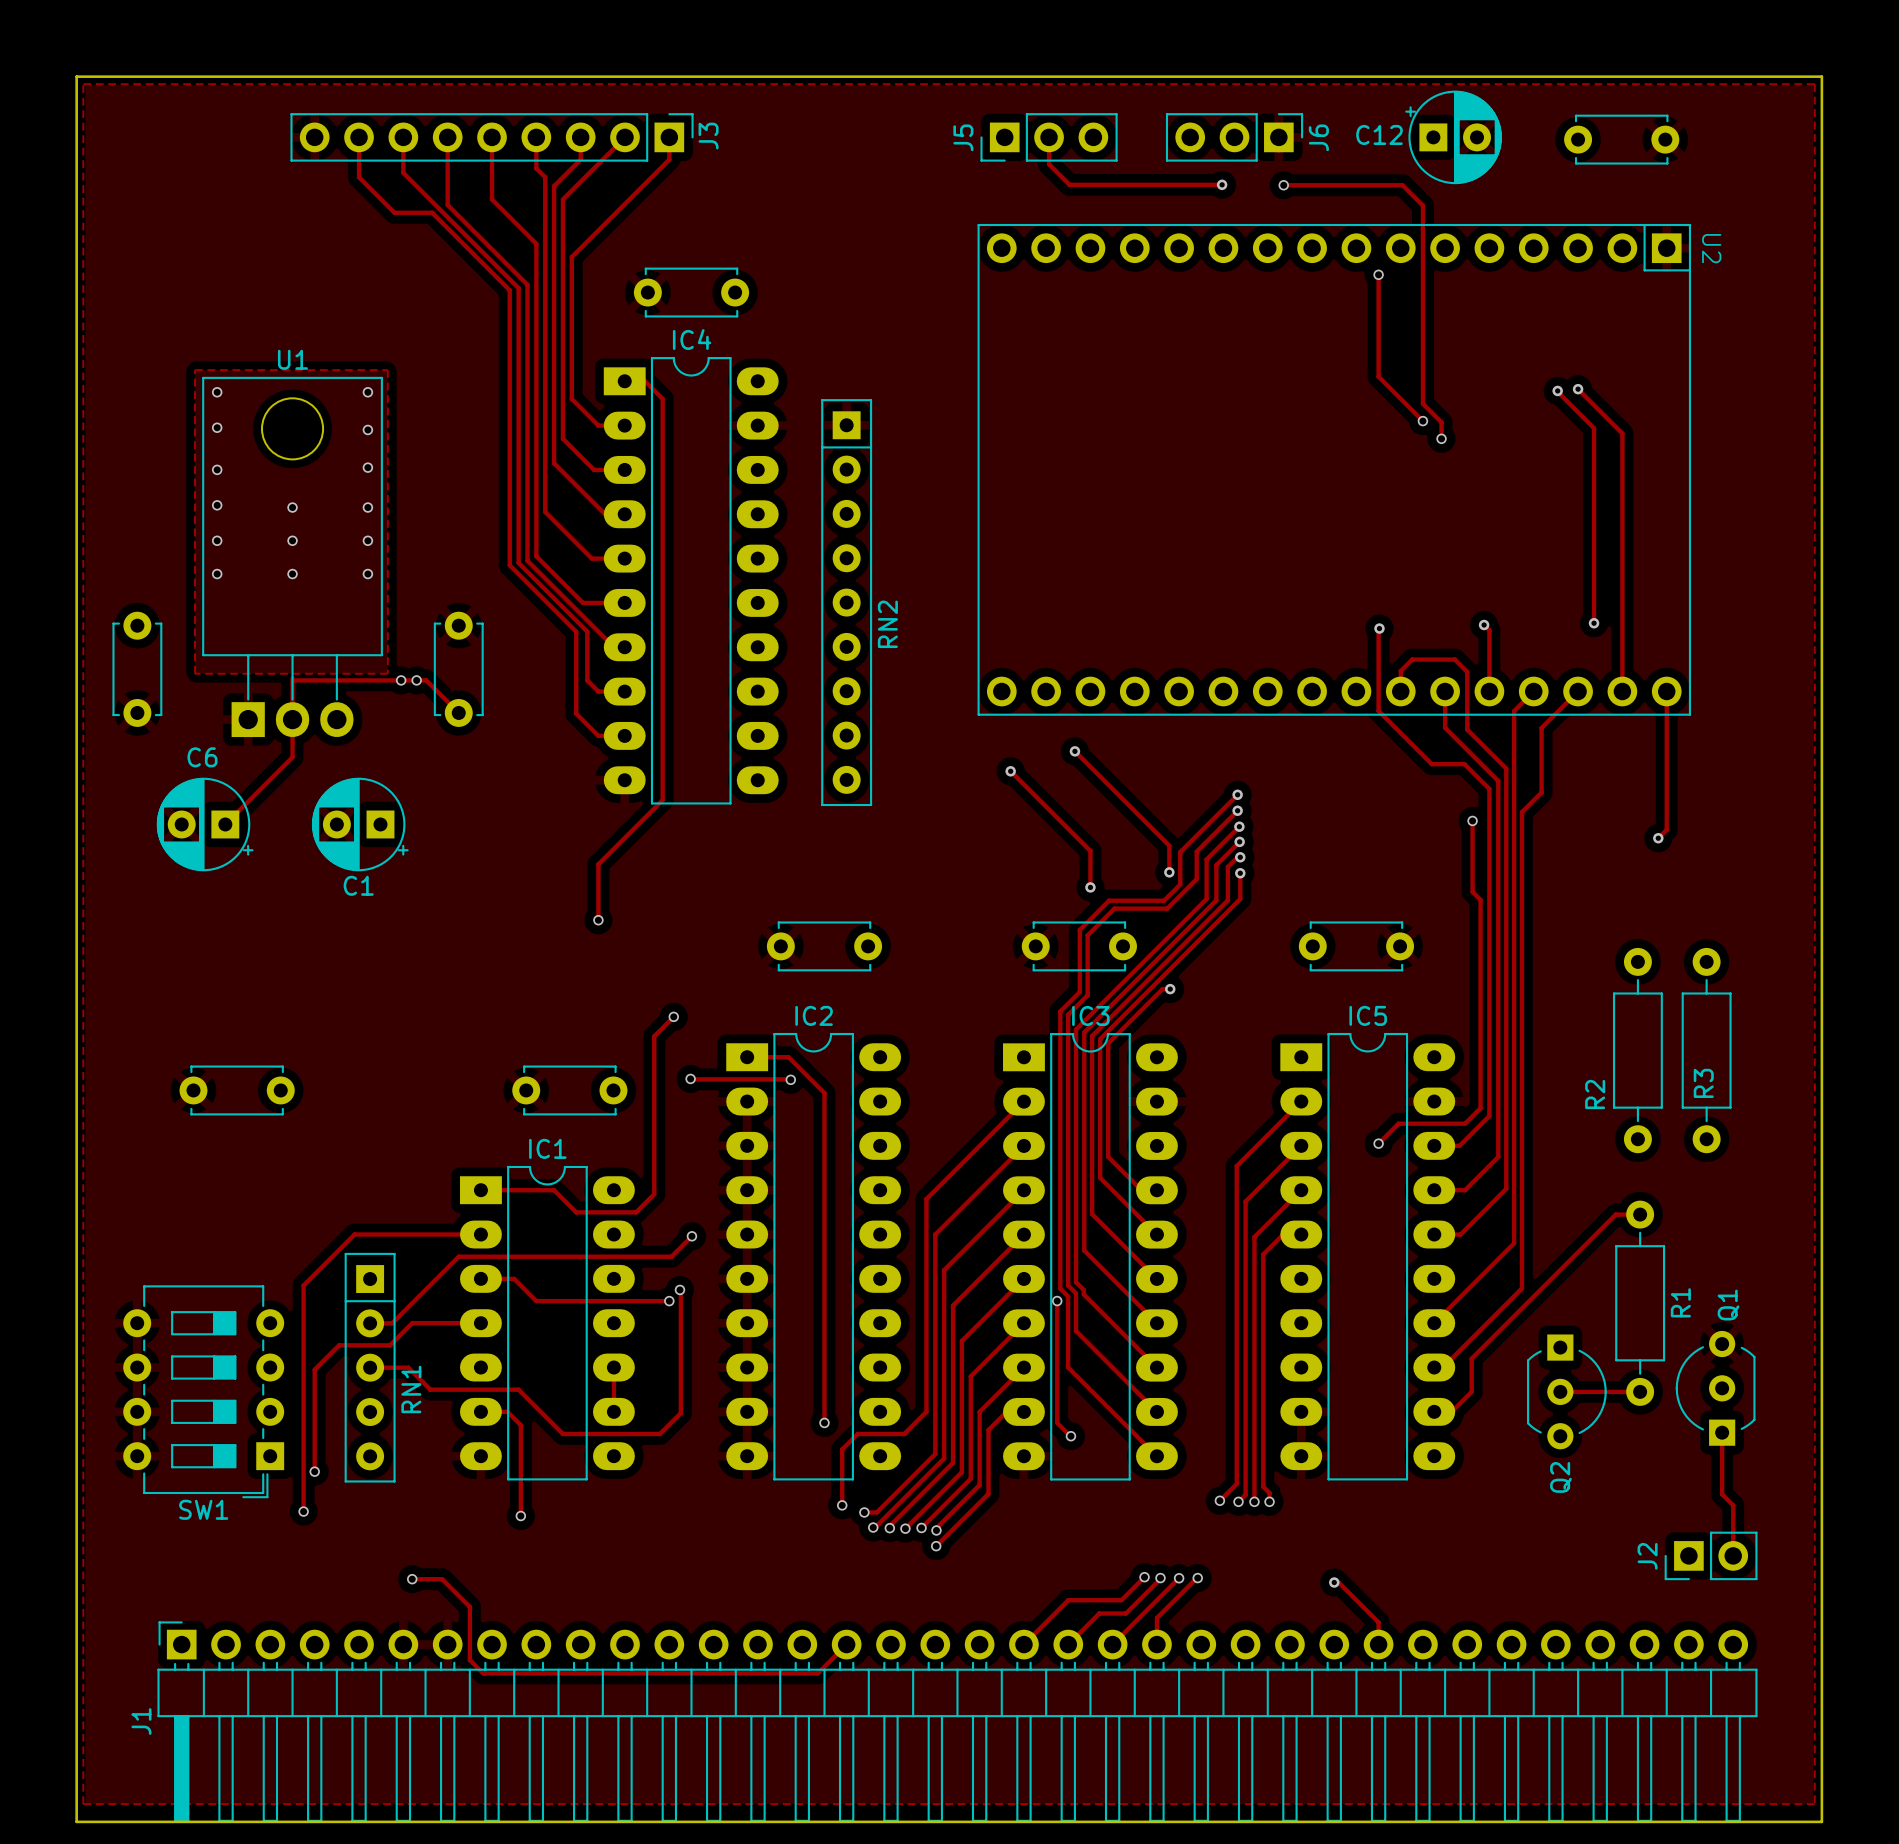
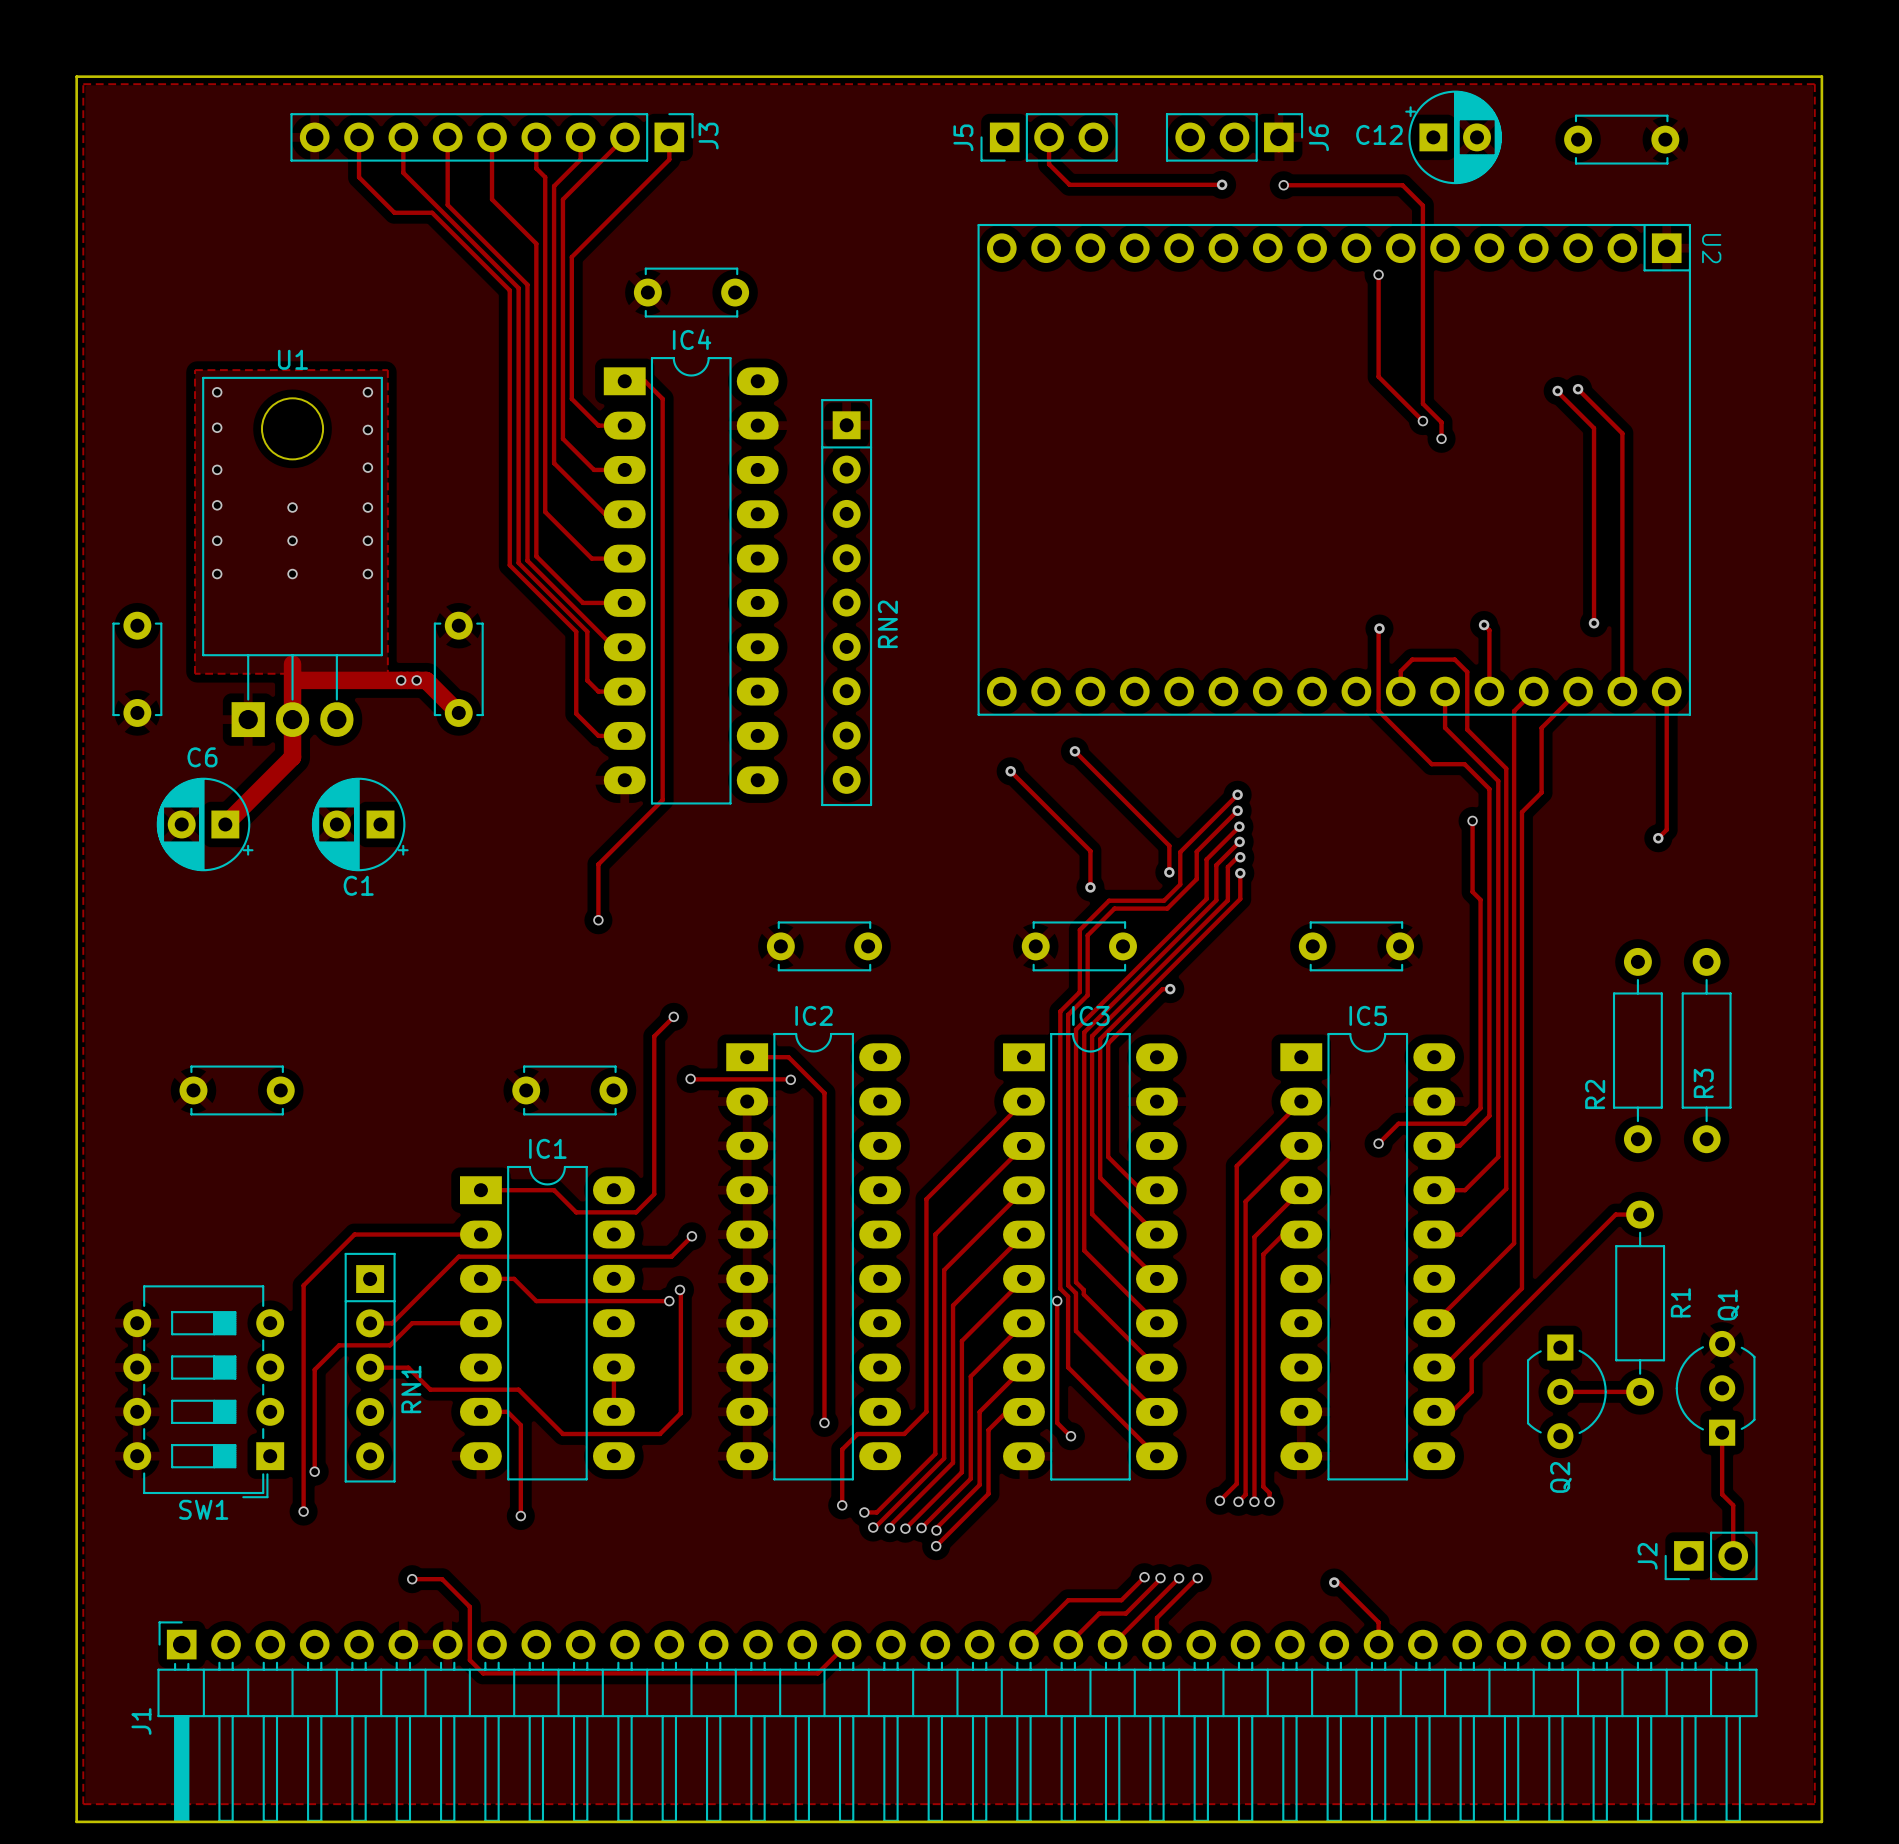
track: none -> (292, 664) (292, 678)
track width: thin (292, 678) (292, 757) (225, 824) -> thick (292, 678) (292, 757) (225, 824)
track width: thin (294, 680) (426, 680) (458, 712) -> thick (294, 680) (426, 680) (458, 712)

